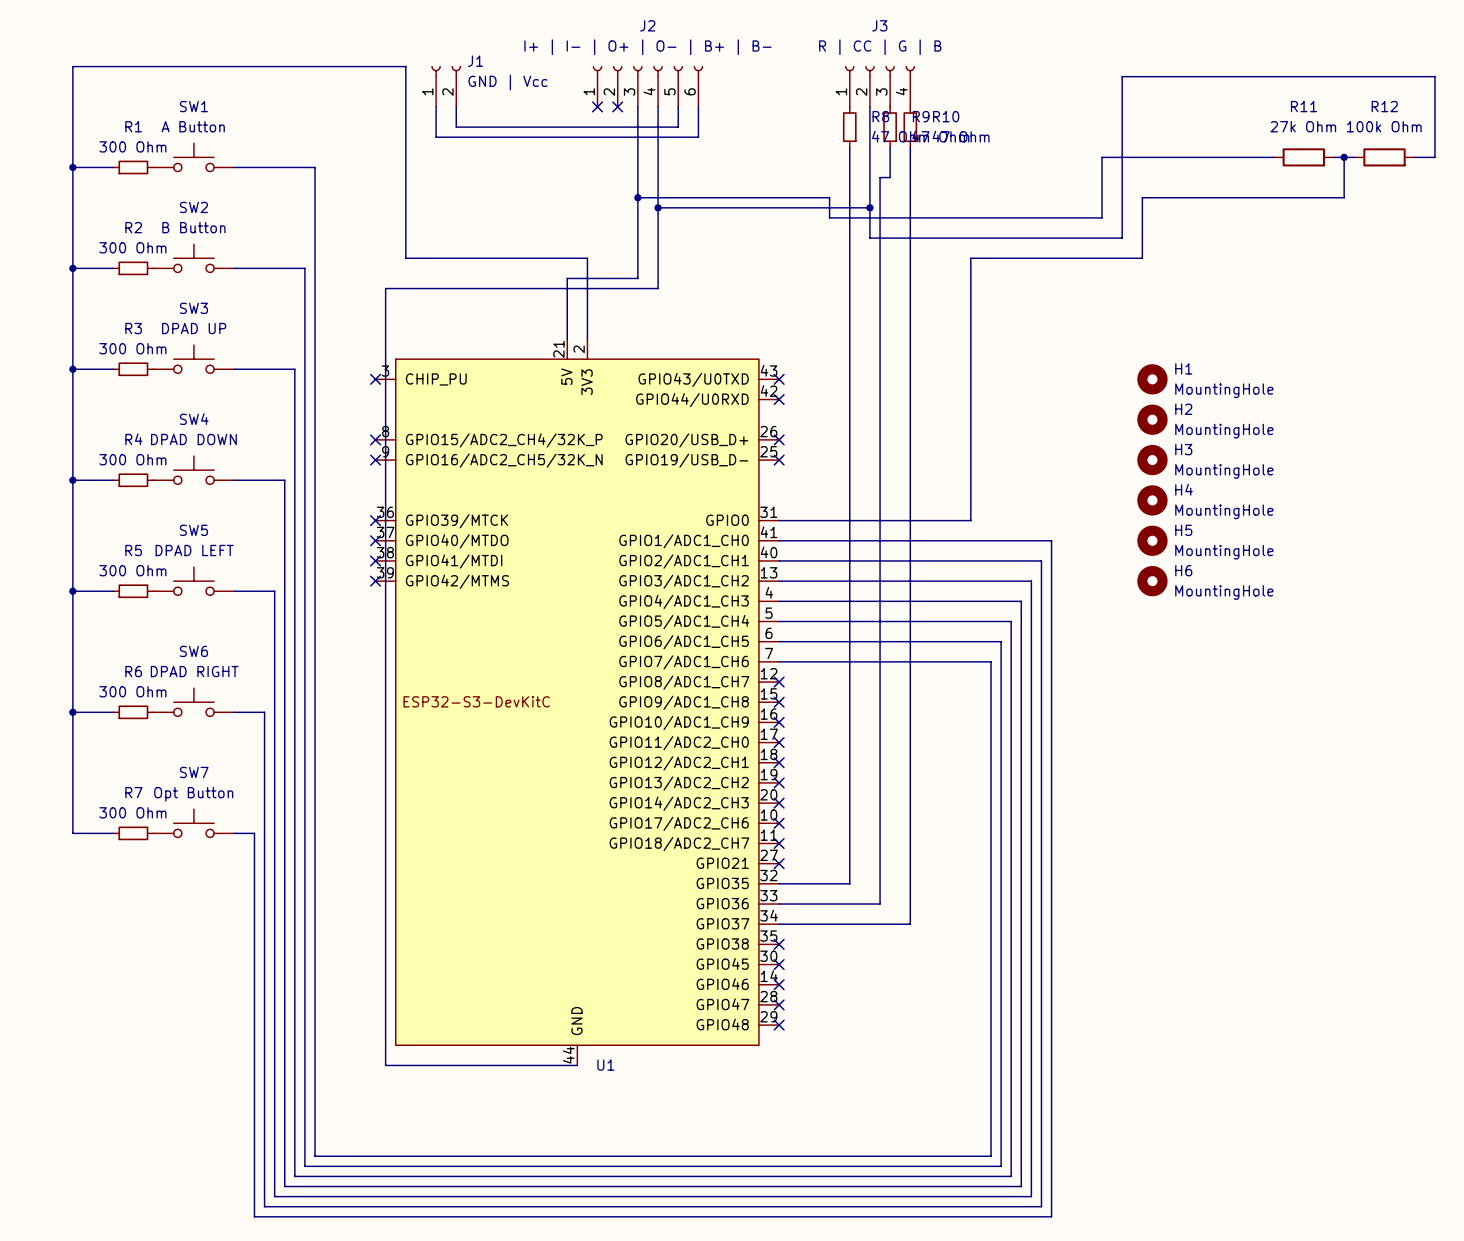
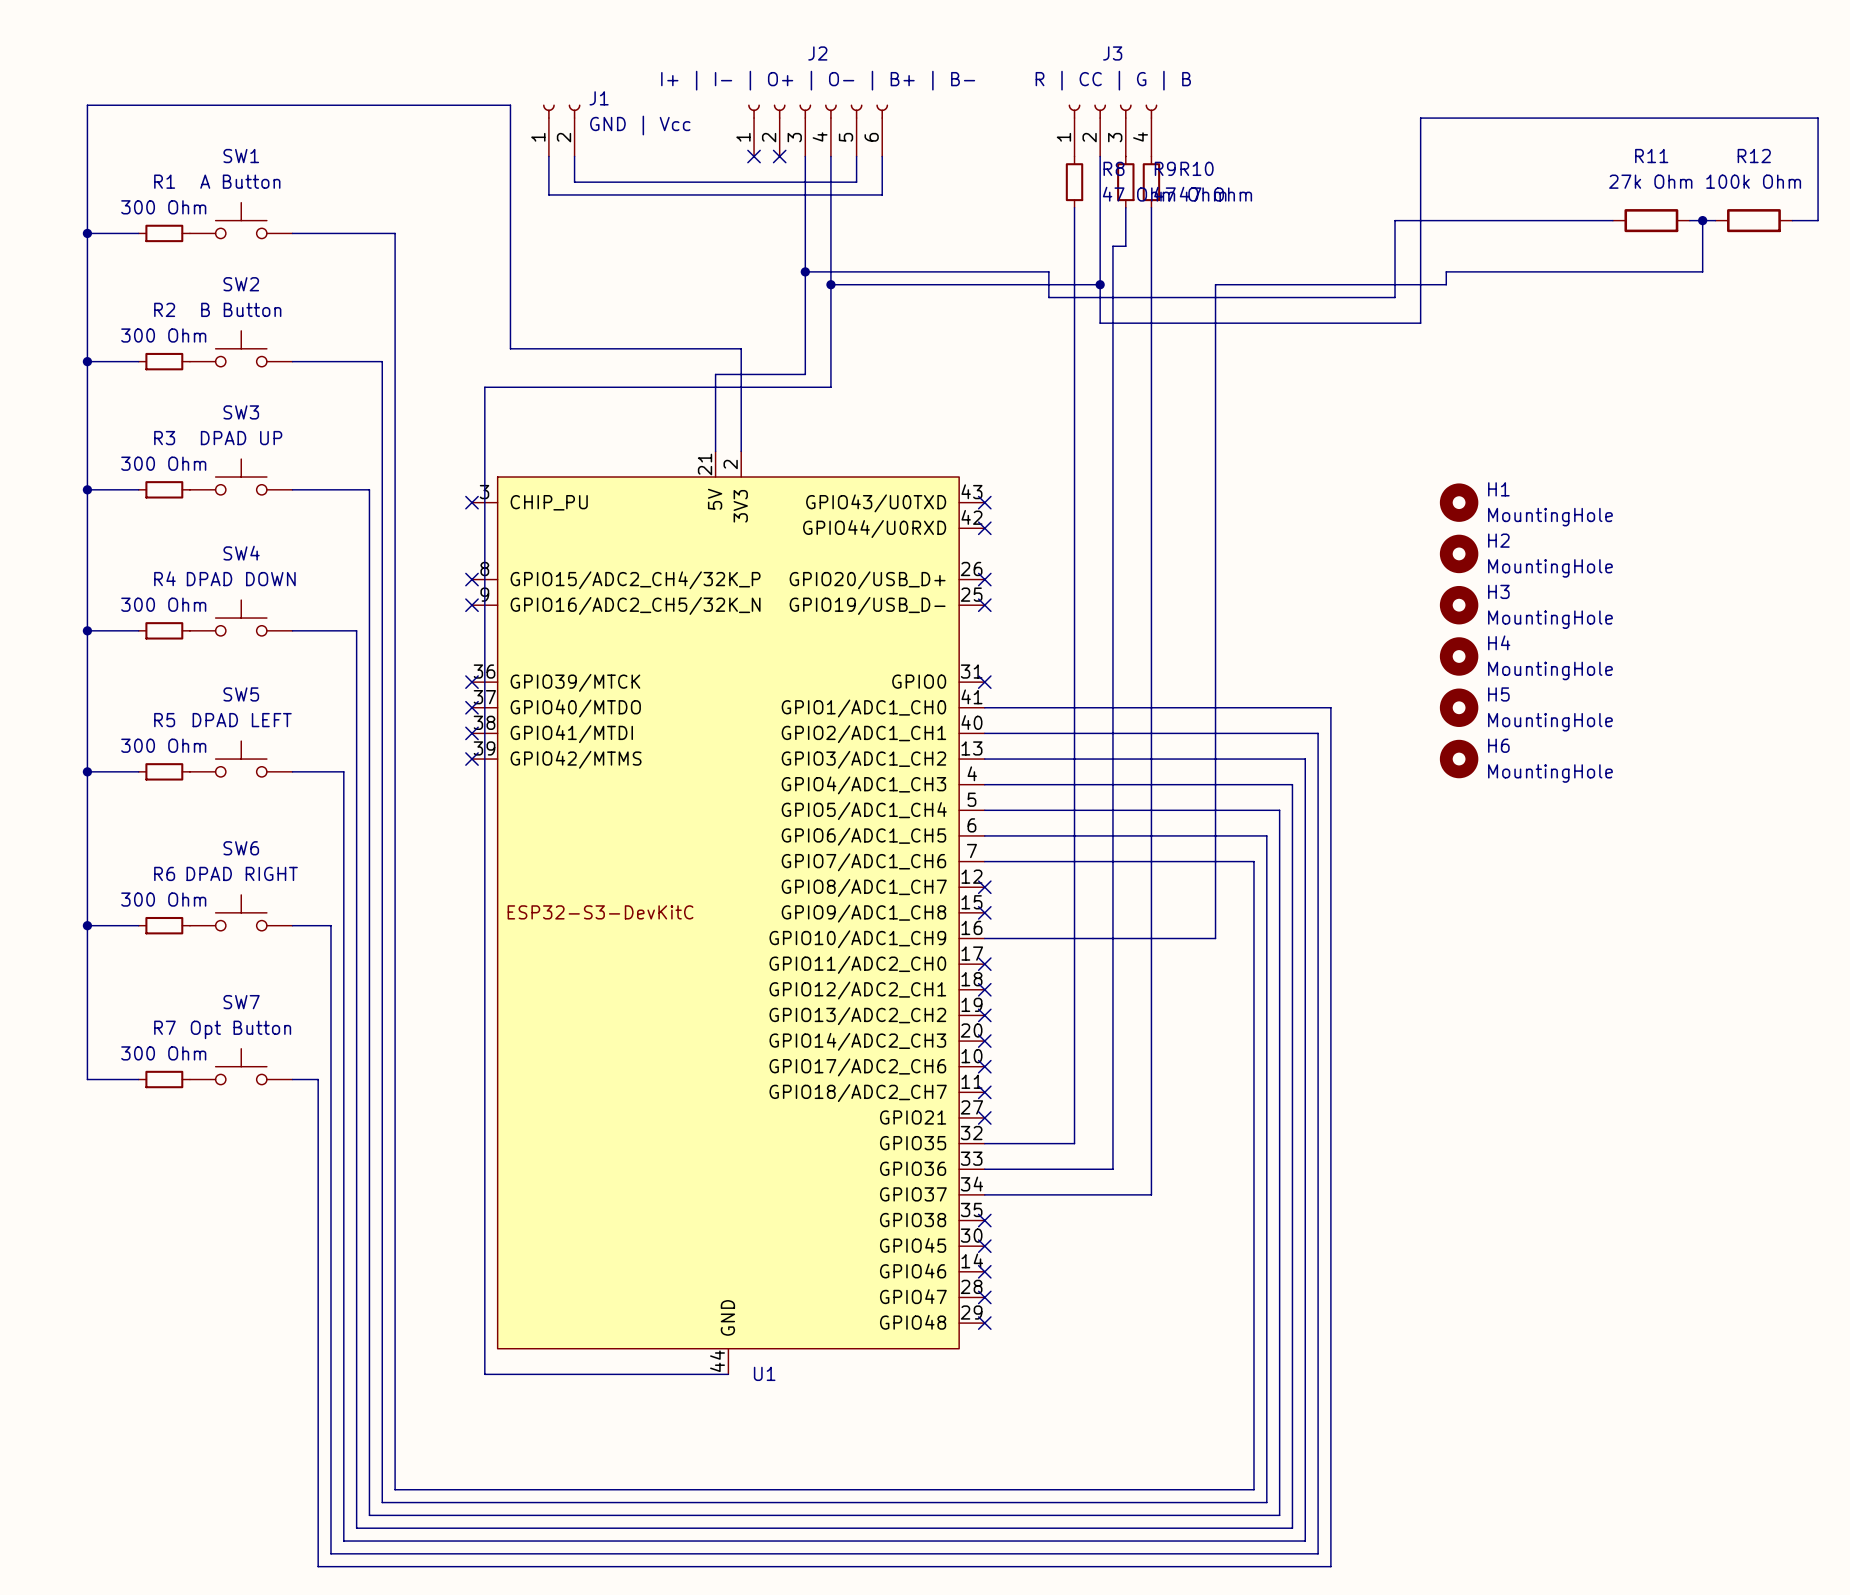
wire: (1142, 207) (1142, 258) (970, 258) (970, 520) (779, 520) -> (1446, 284) (1215, 284) (1215, 938) (984, 938)
no-connect mark: none -> (984, 682)
no-connect mark: (779, 722) -> none

